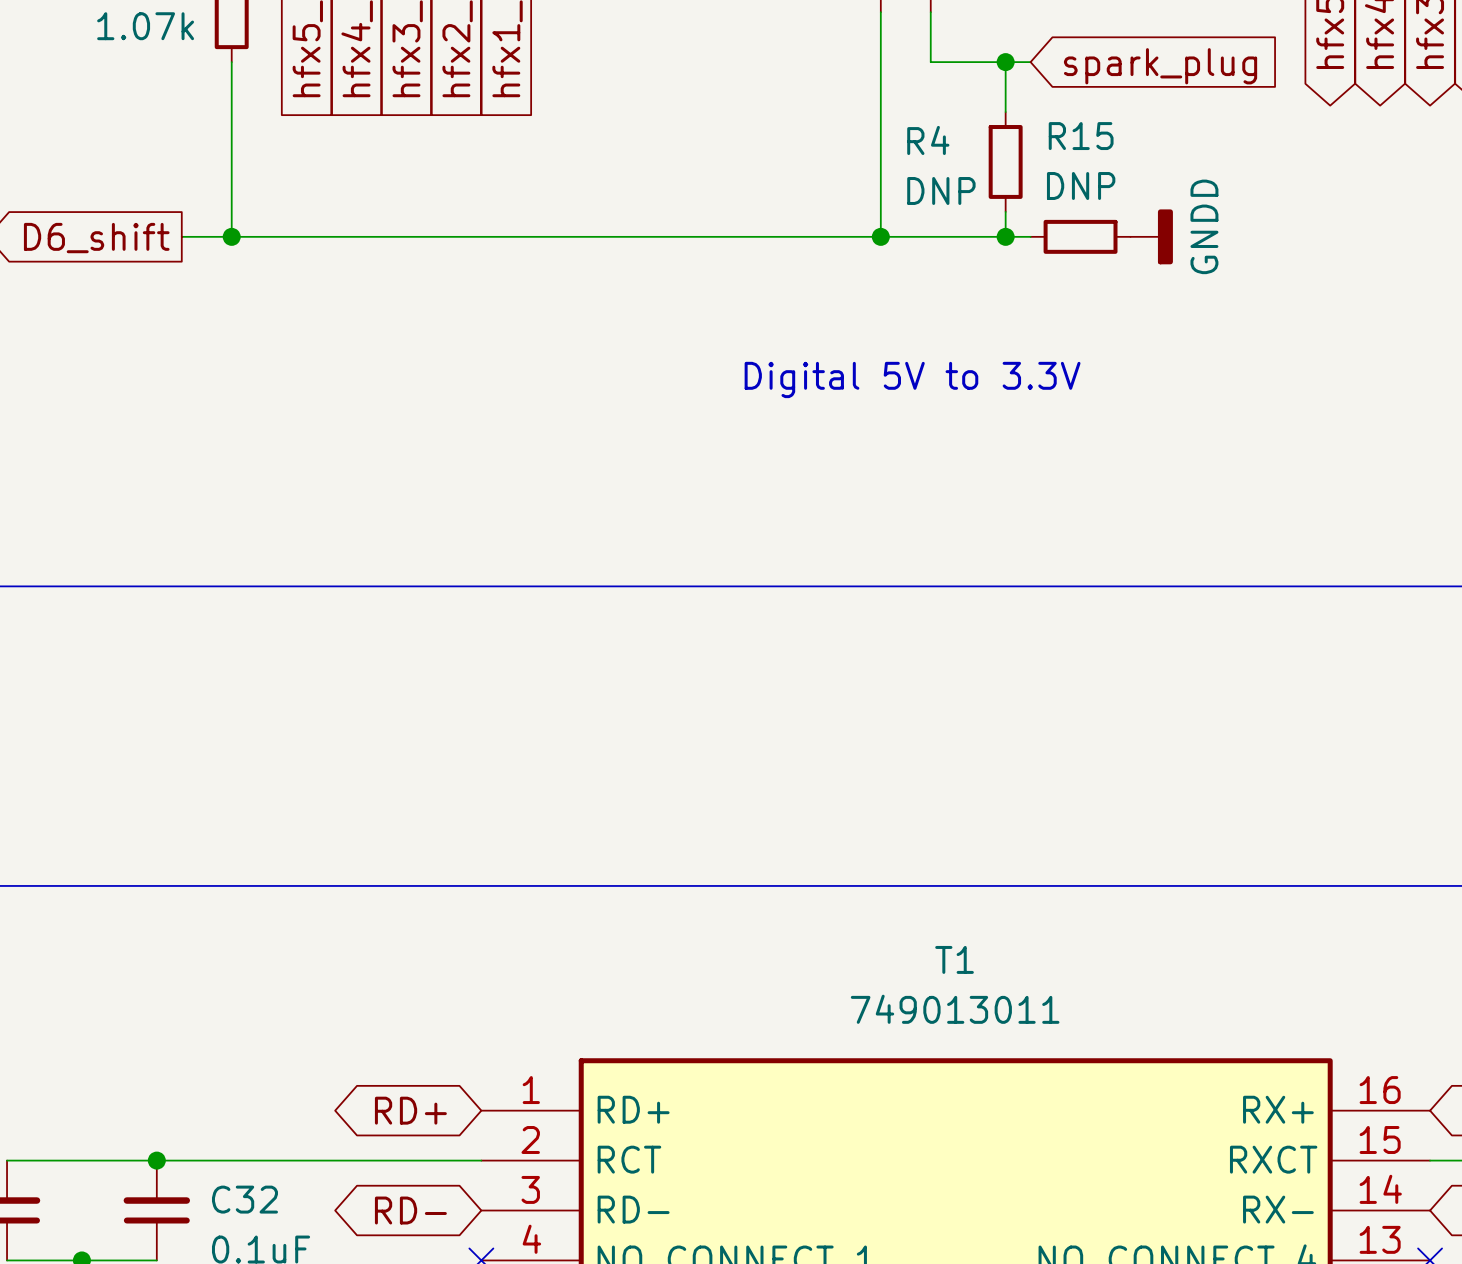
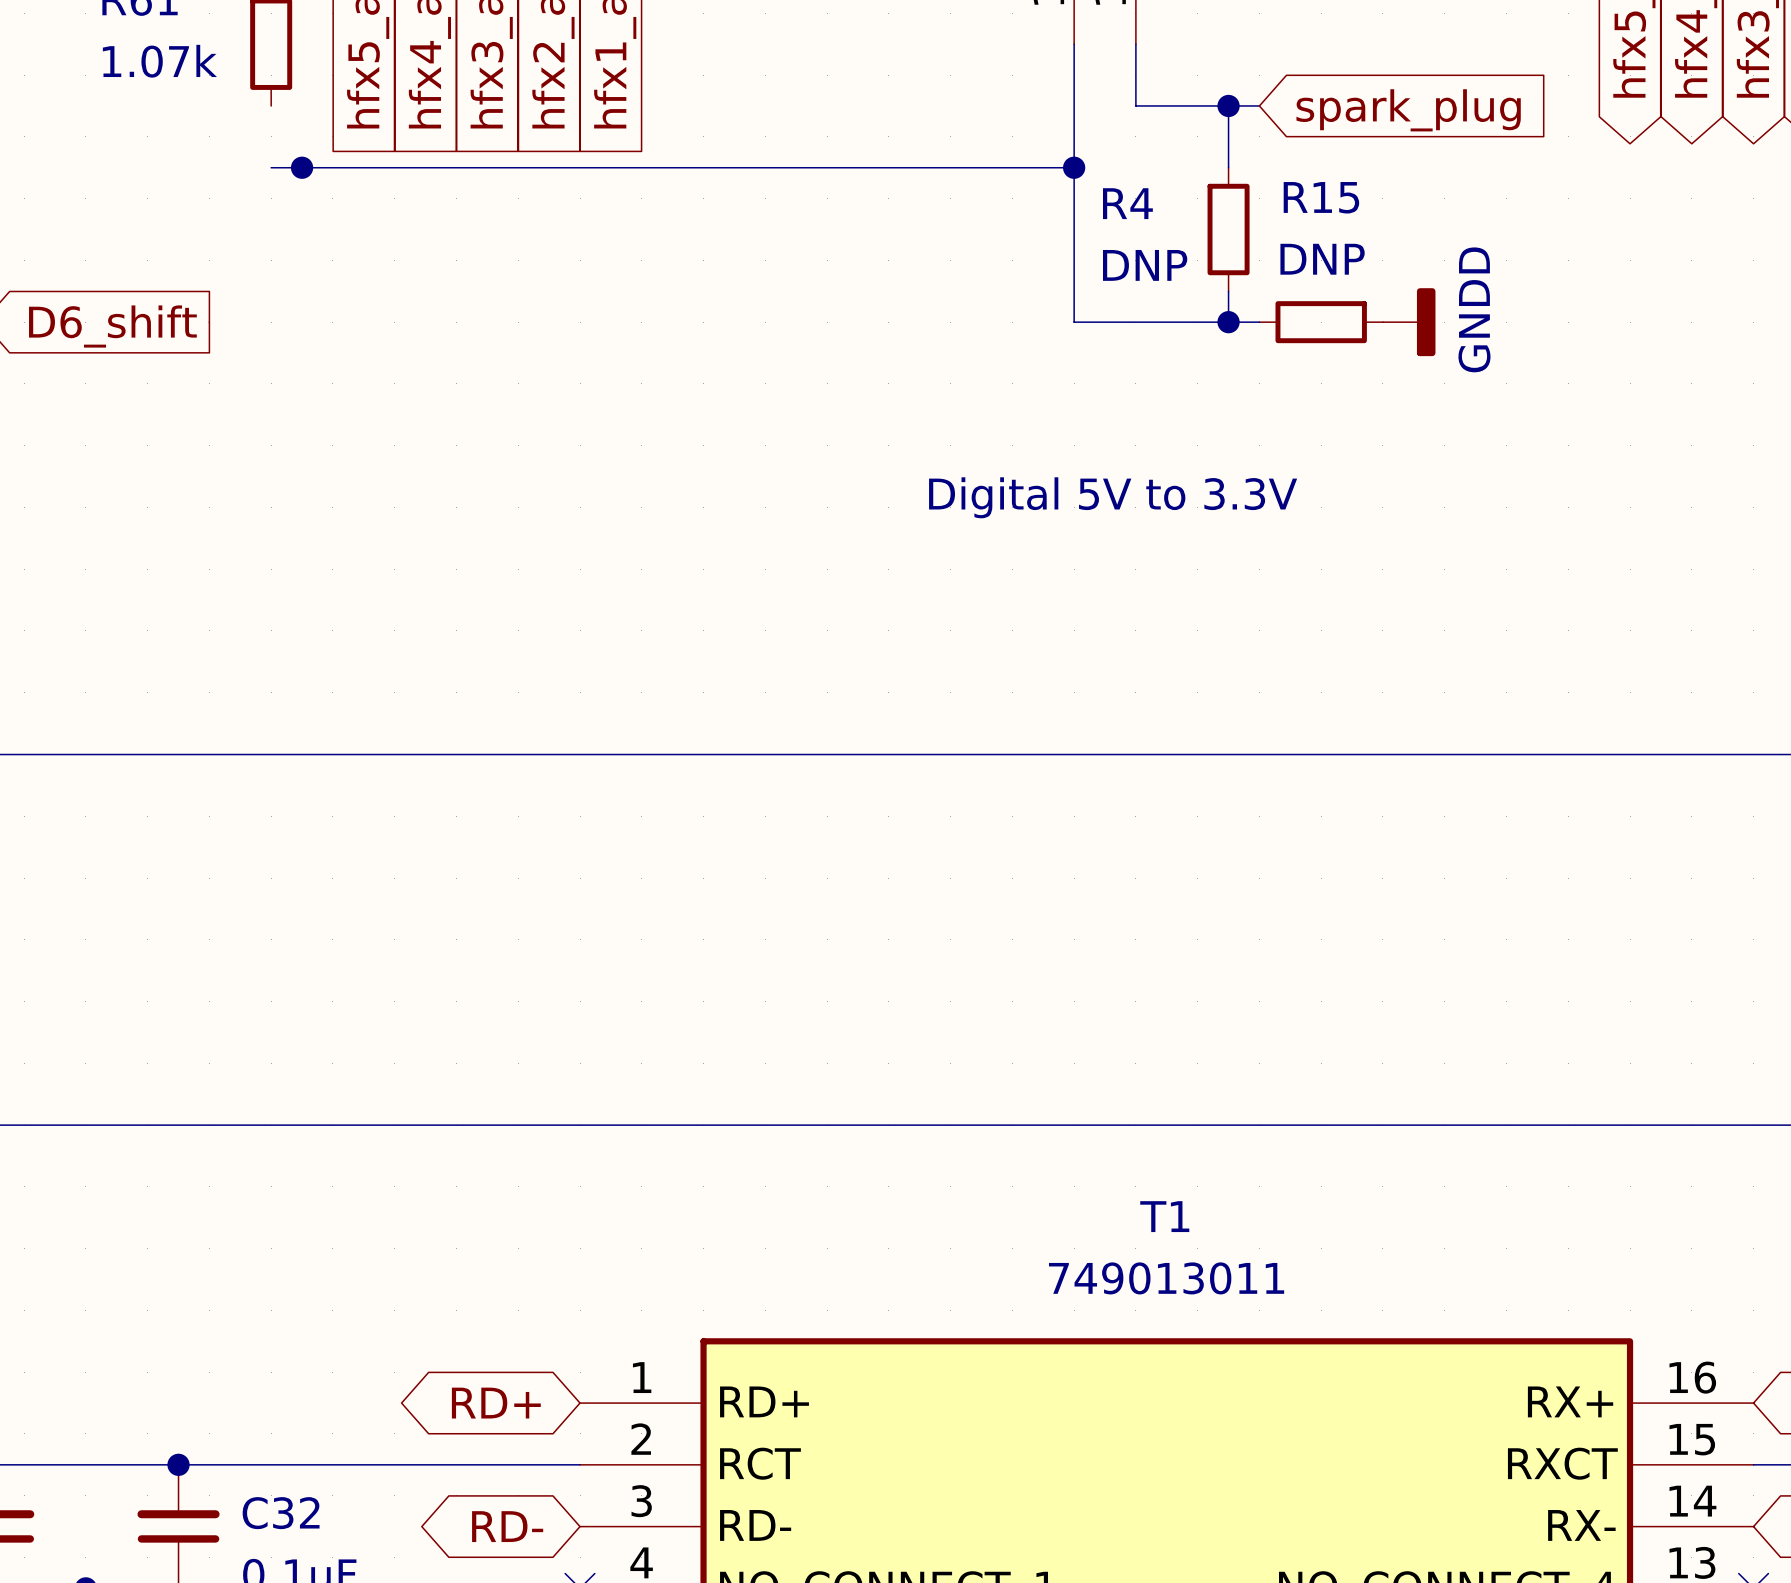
wire: (231, 62) (231, 236) -> none
wire: none -> (271, 167) (1074, 167)
junction: none -> (302, 167)
junction: none -> (1074, 167)
wire: (181, 236) (880, 236) -> none
junction: (231, 236) -> none
junction: (880, 236) -> none

